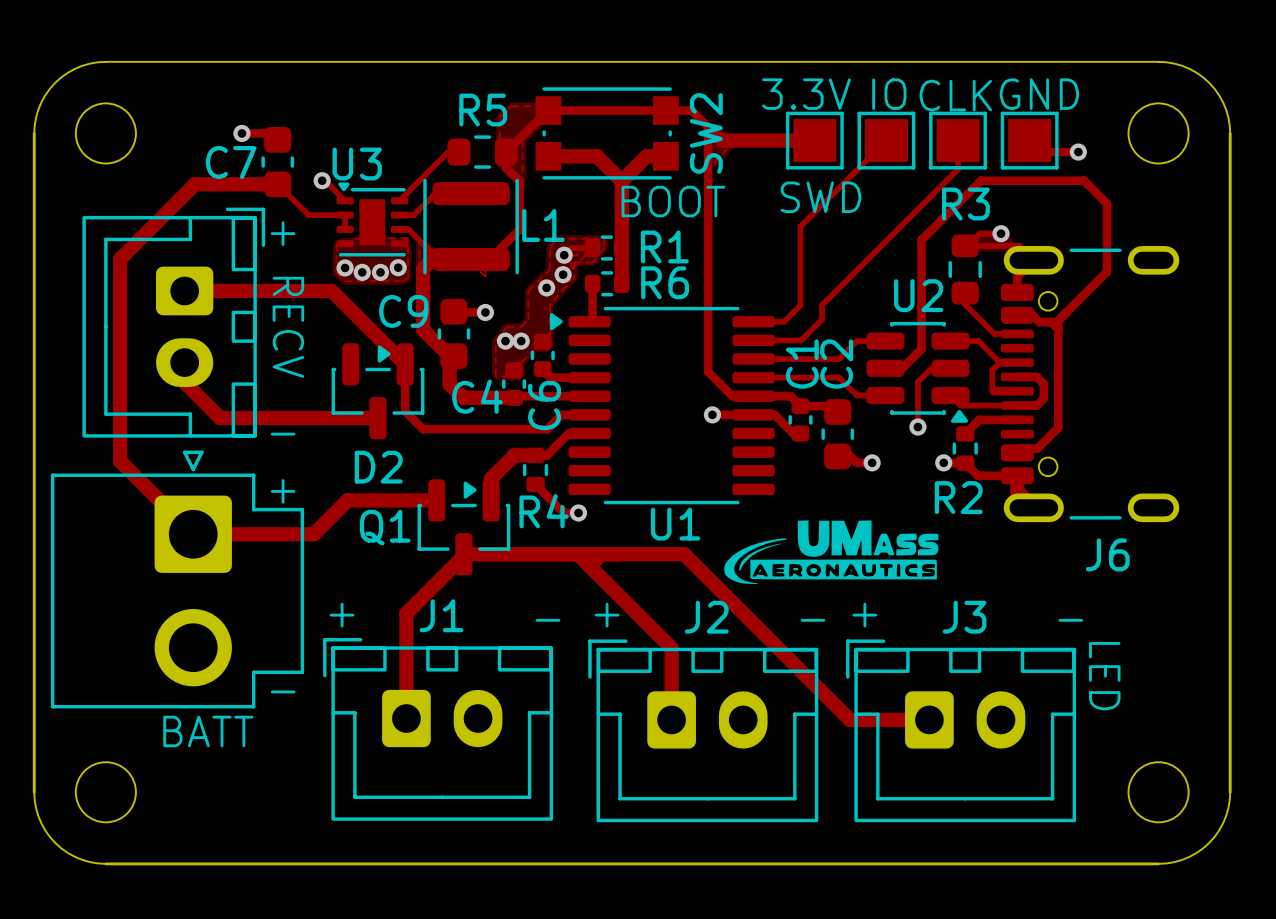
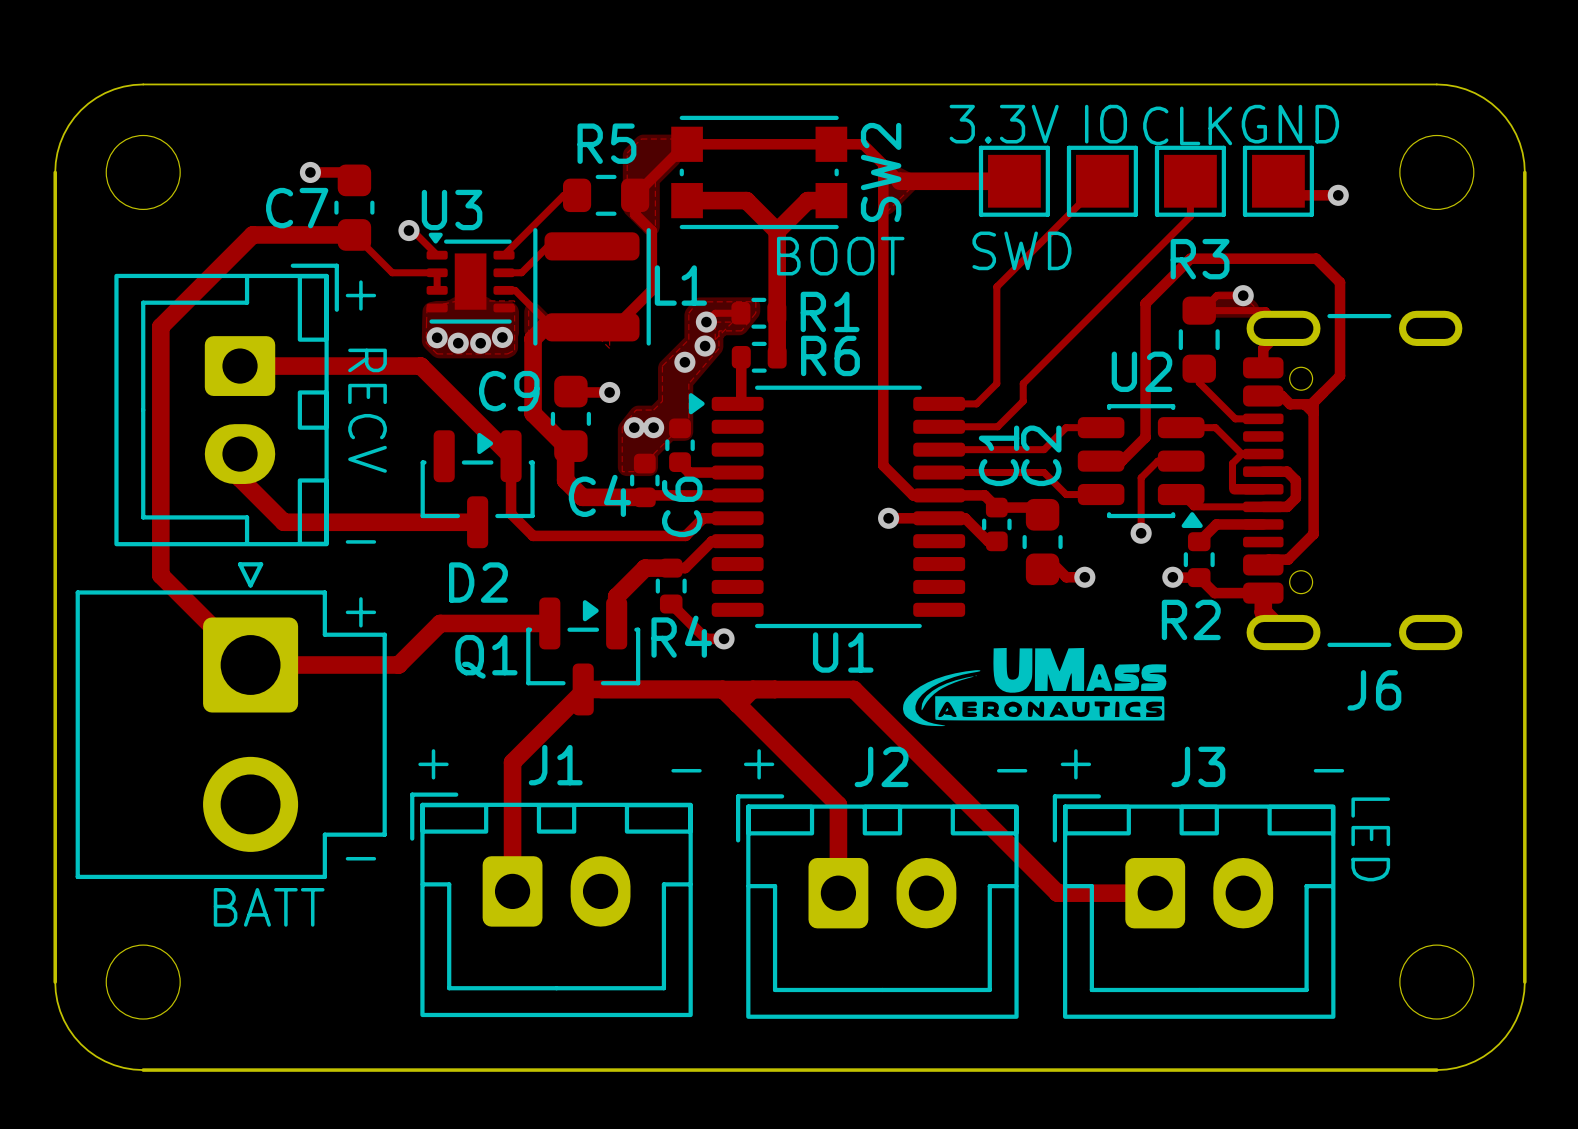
track: (958, 203) (980, 180) (1084, 180) (1107, 203) (1107, 271) (1079, 299) -> (1190, 258) (1316, 258) (1340, 282) (1340, 375)

